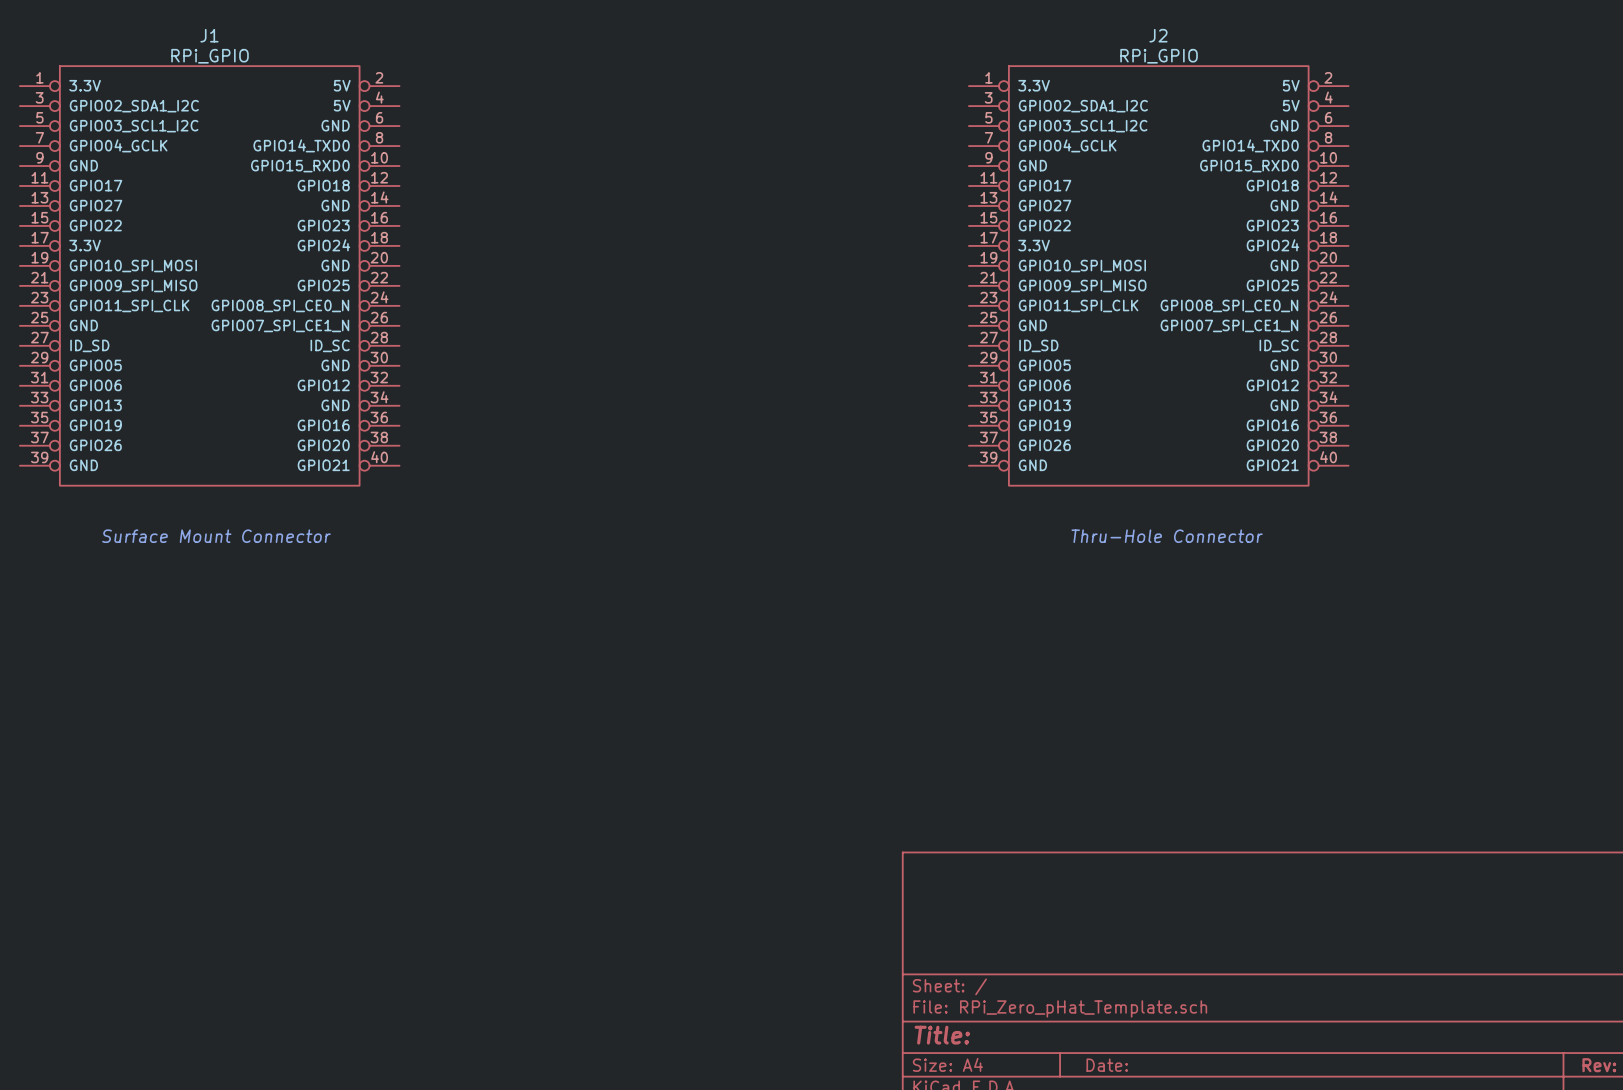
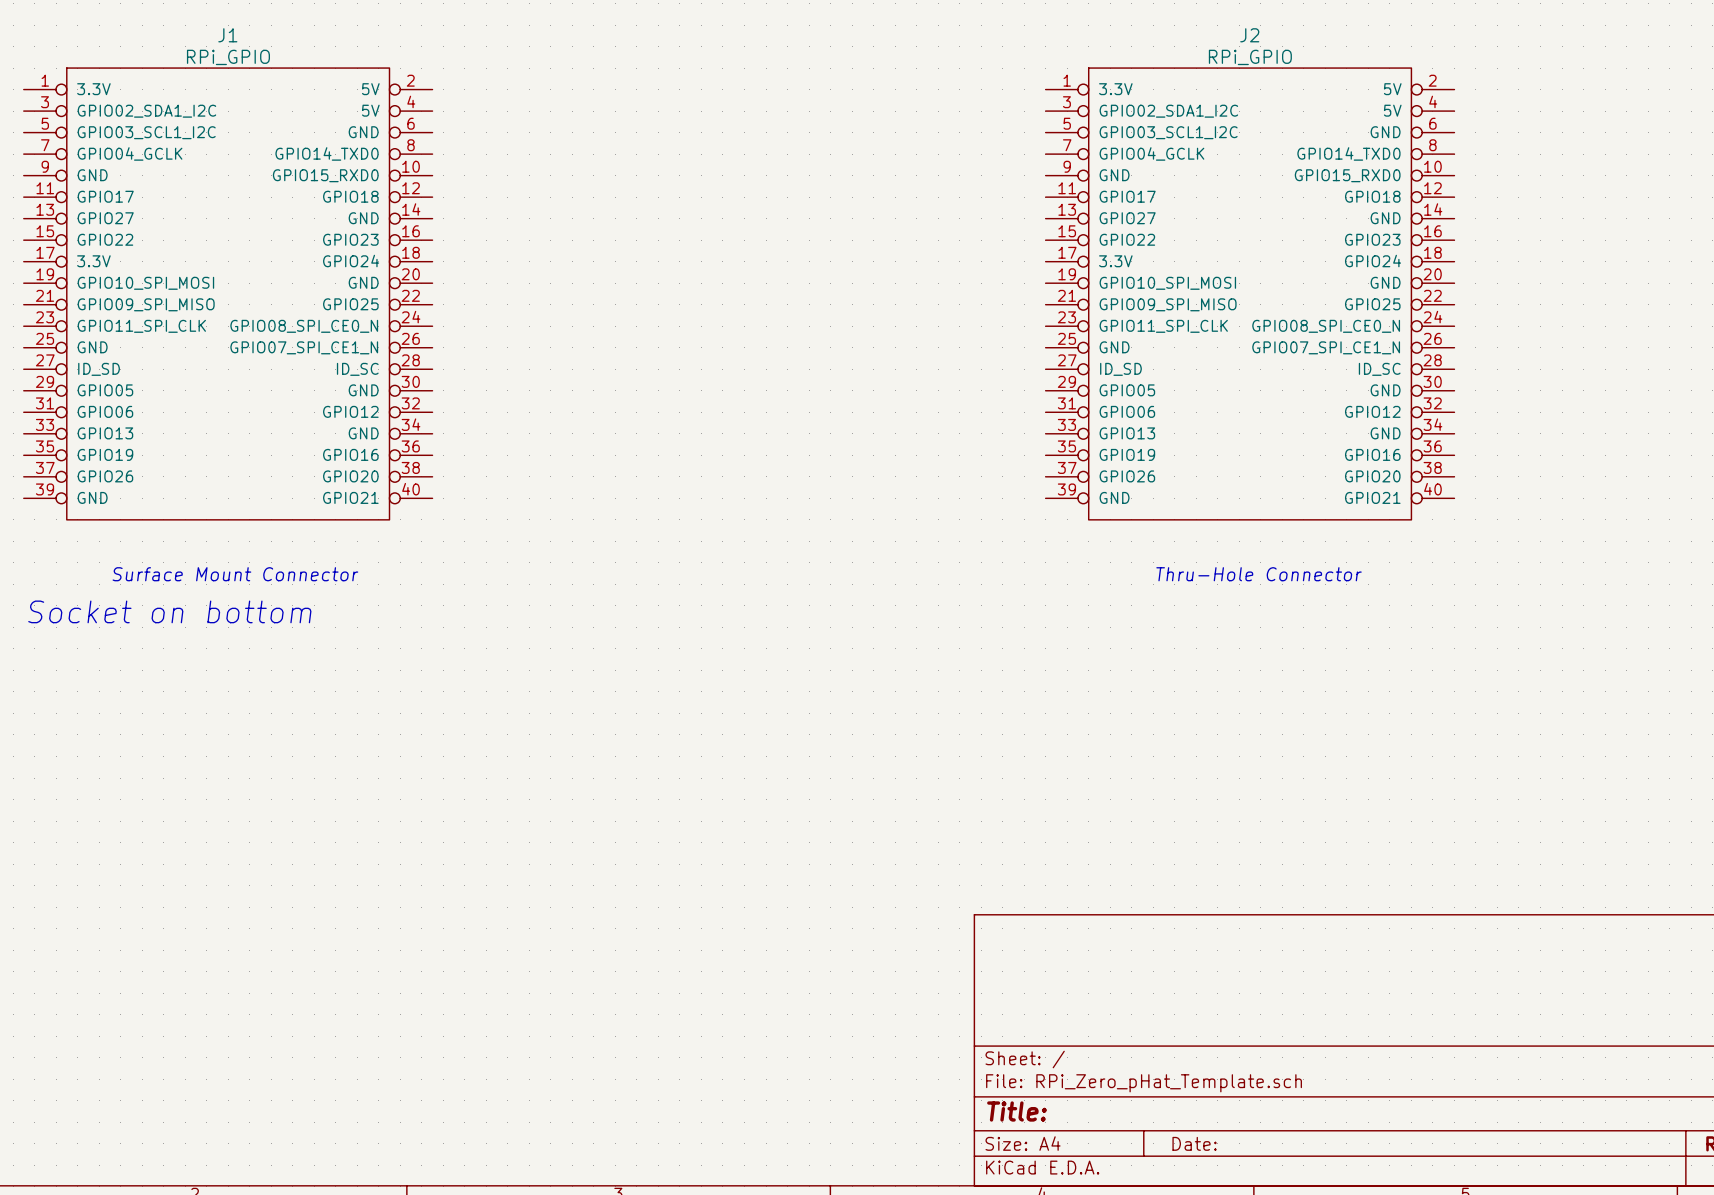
text: none -> Socket on bottom (169, 611)

